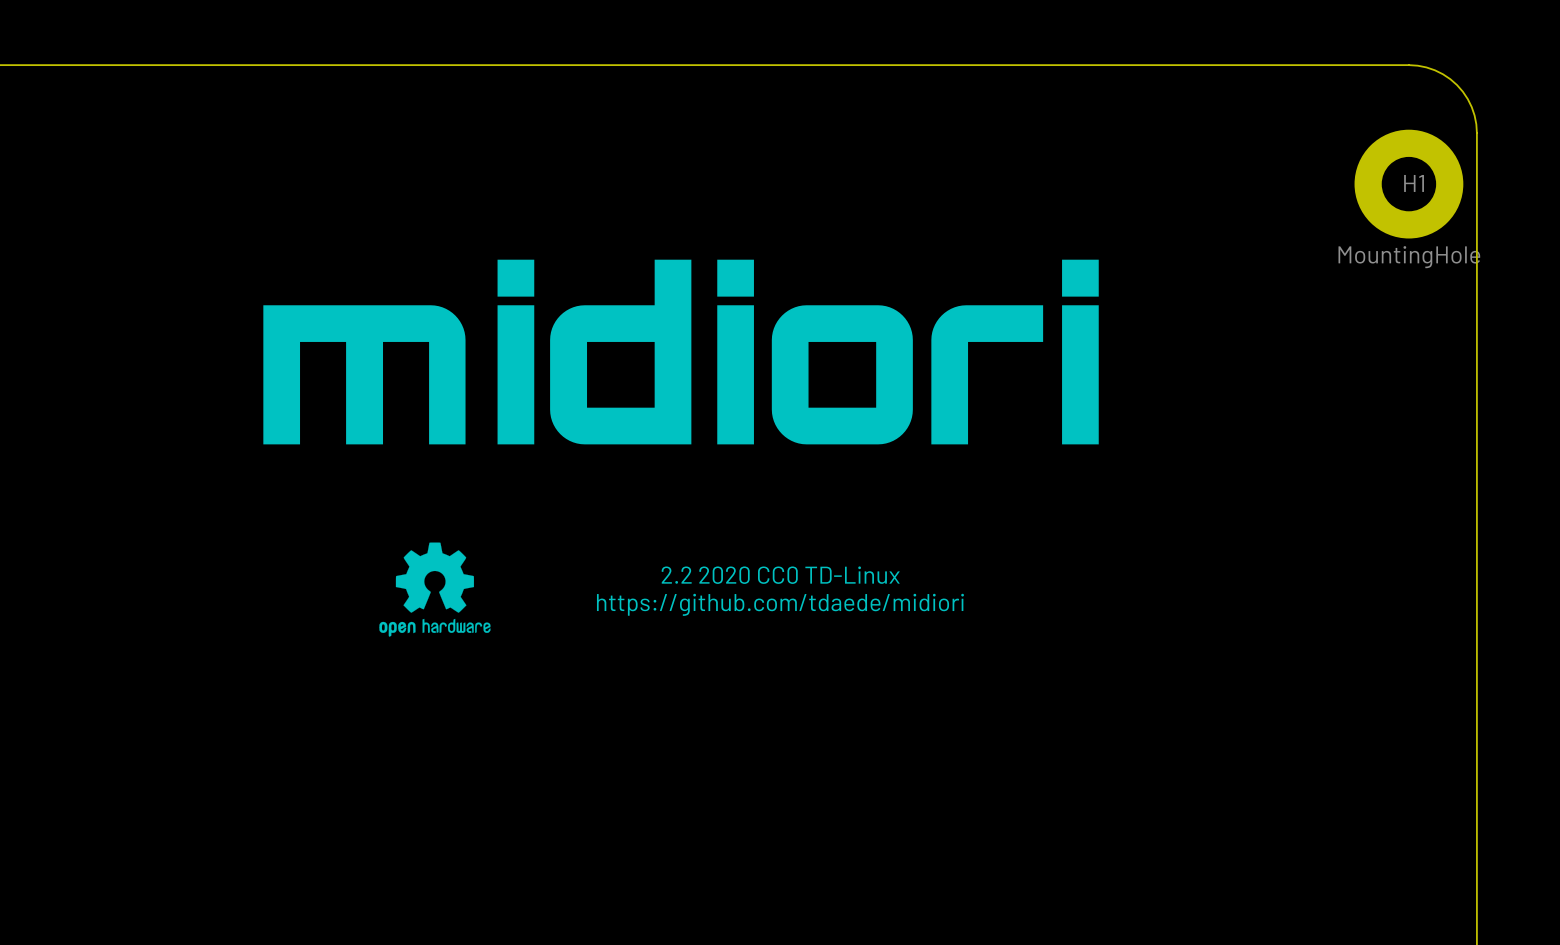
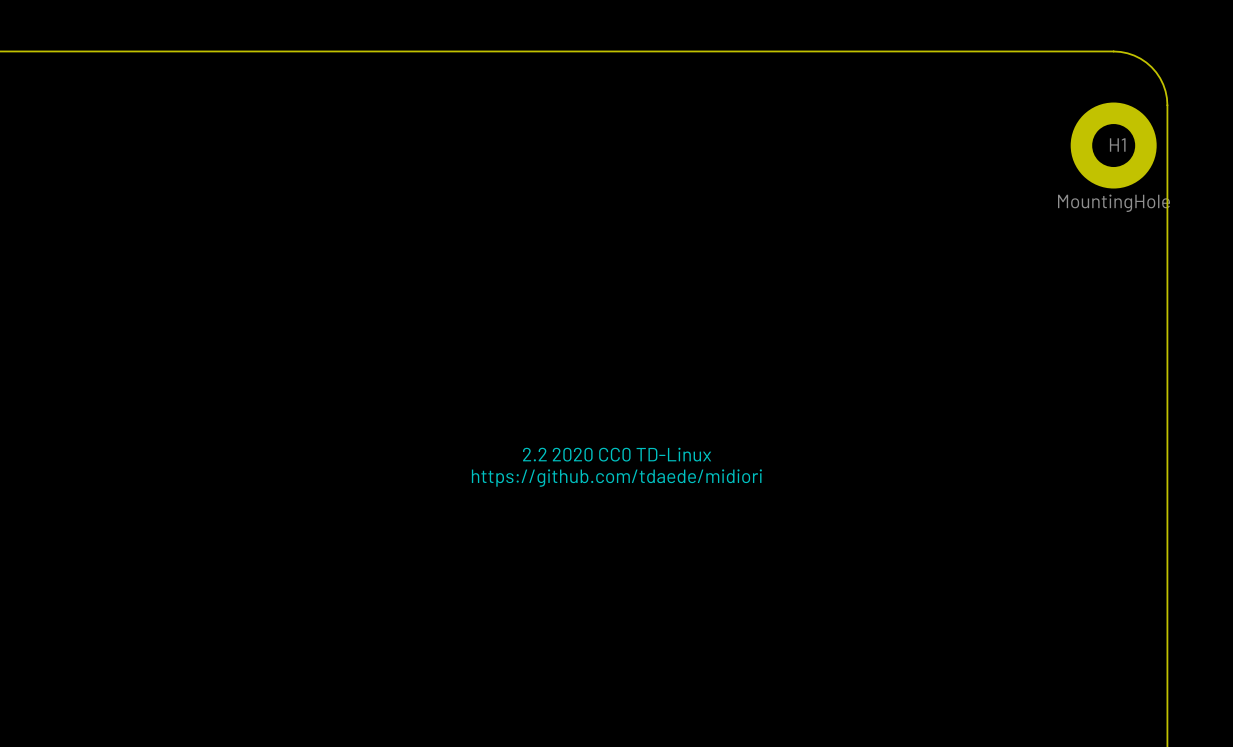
drawing: [263, 259, 1099, 445] -> none
drawing: [379, 542, 491, 637] -> none

